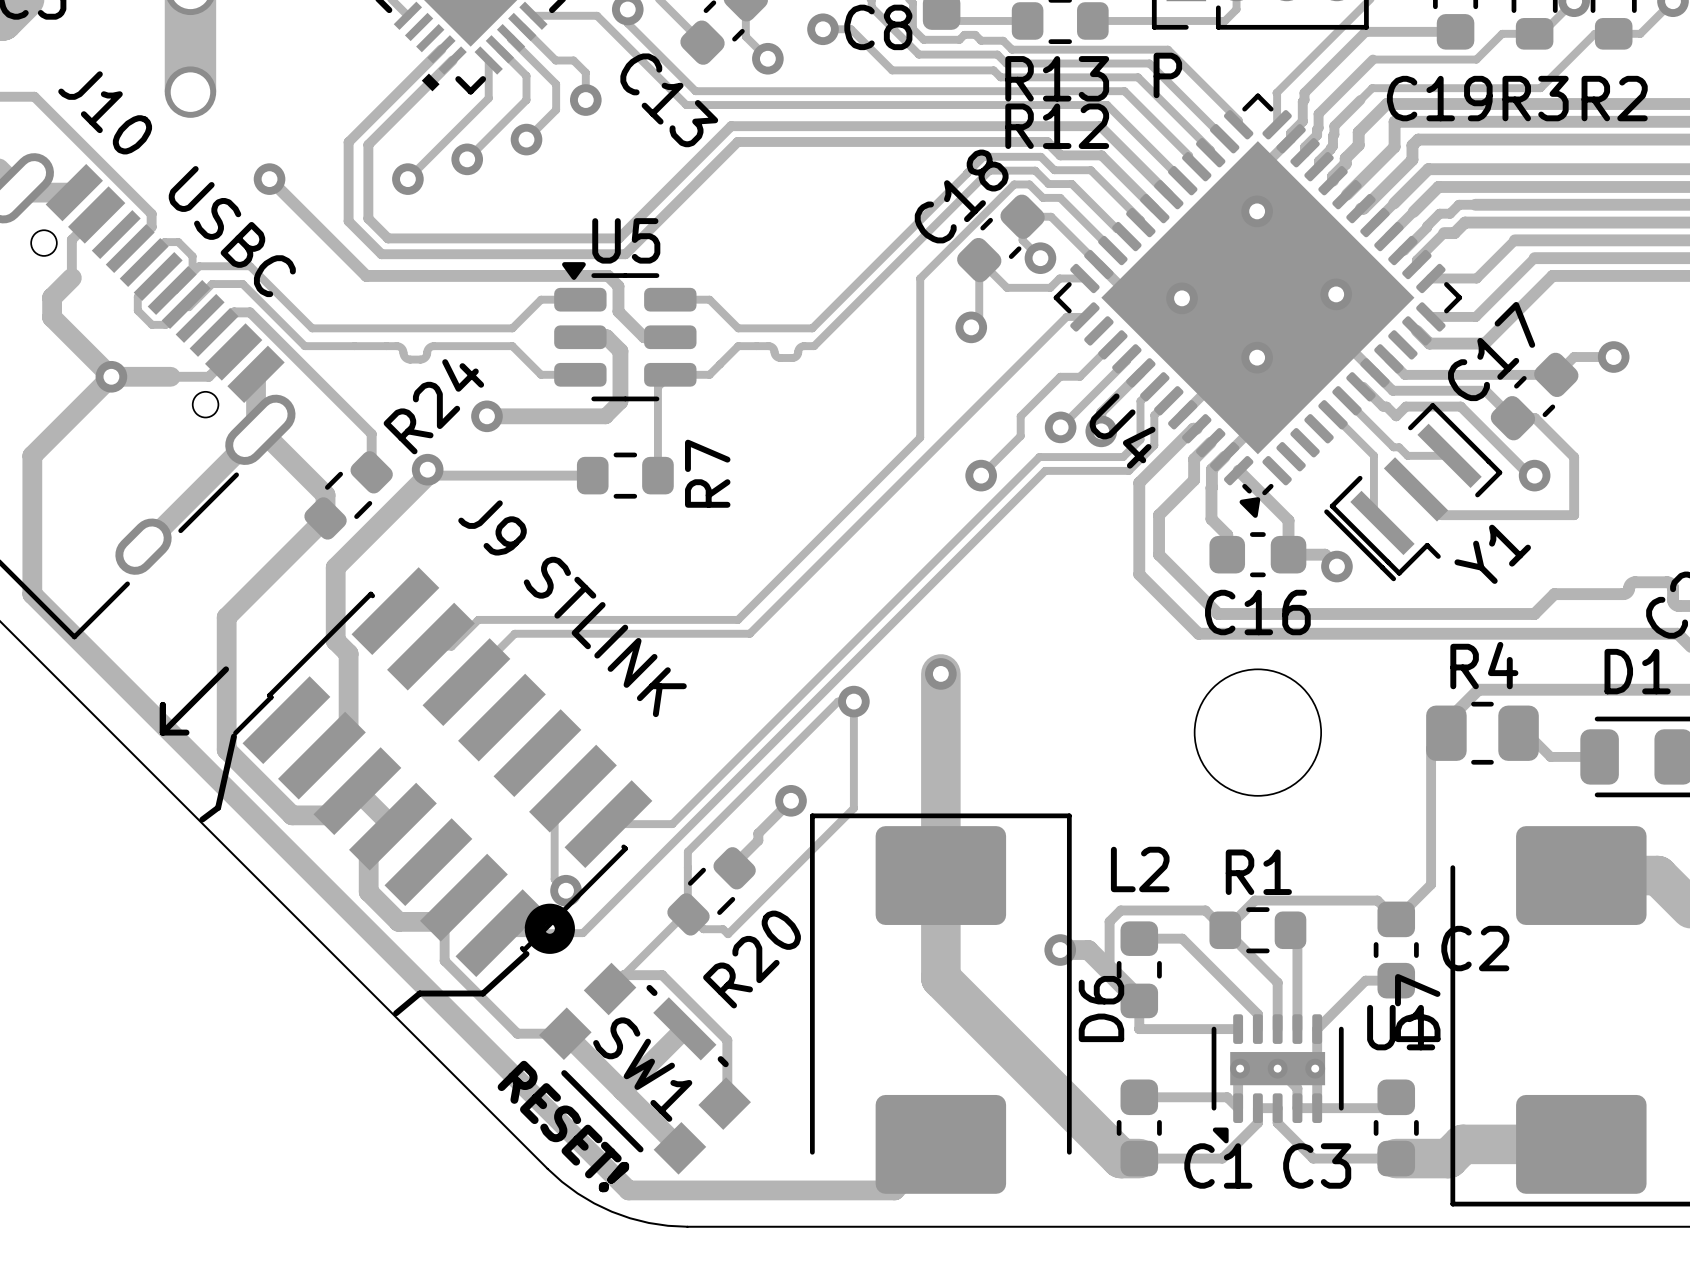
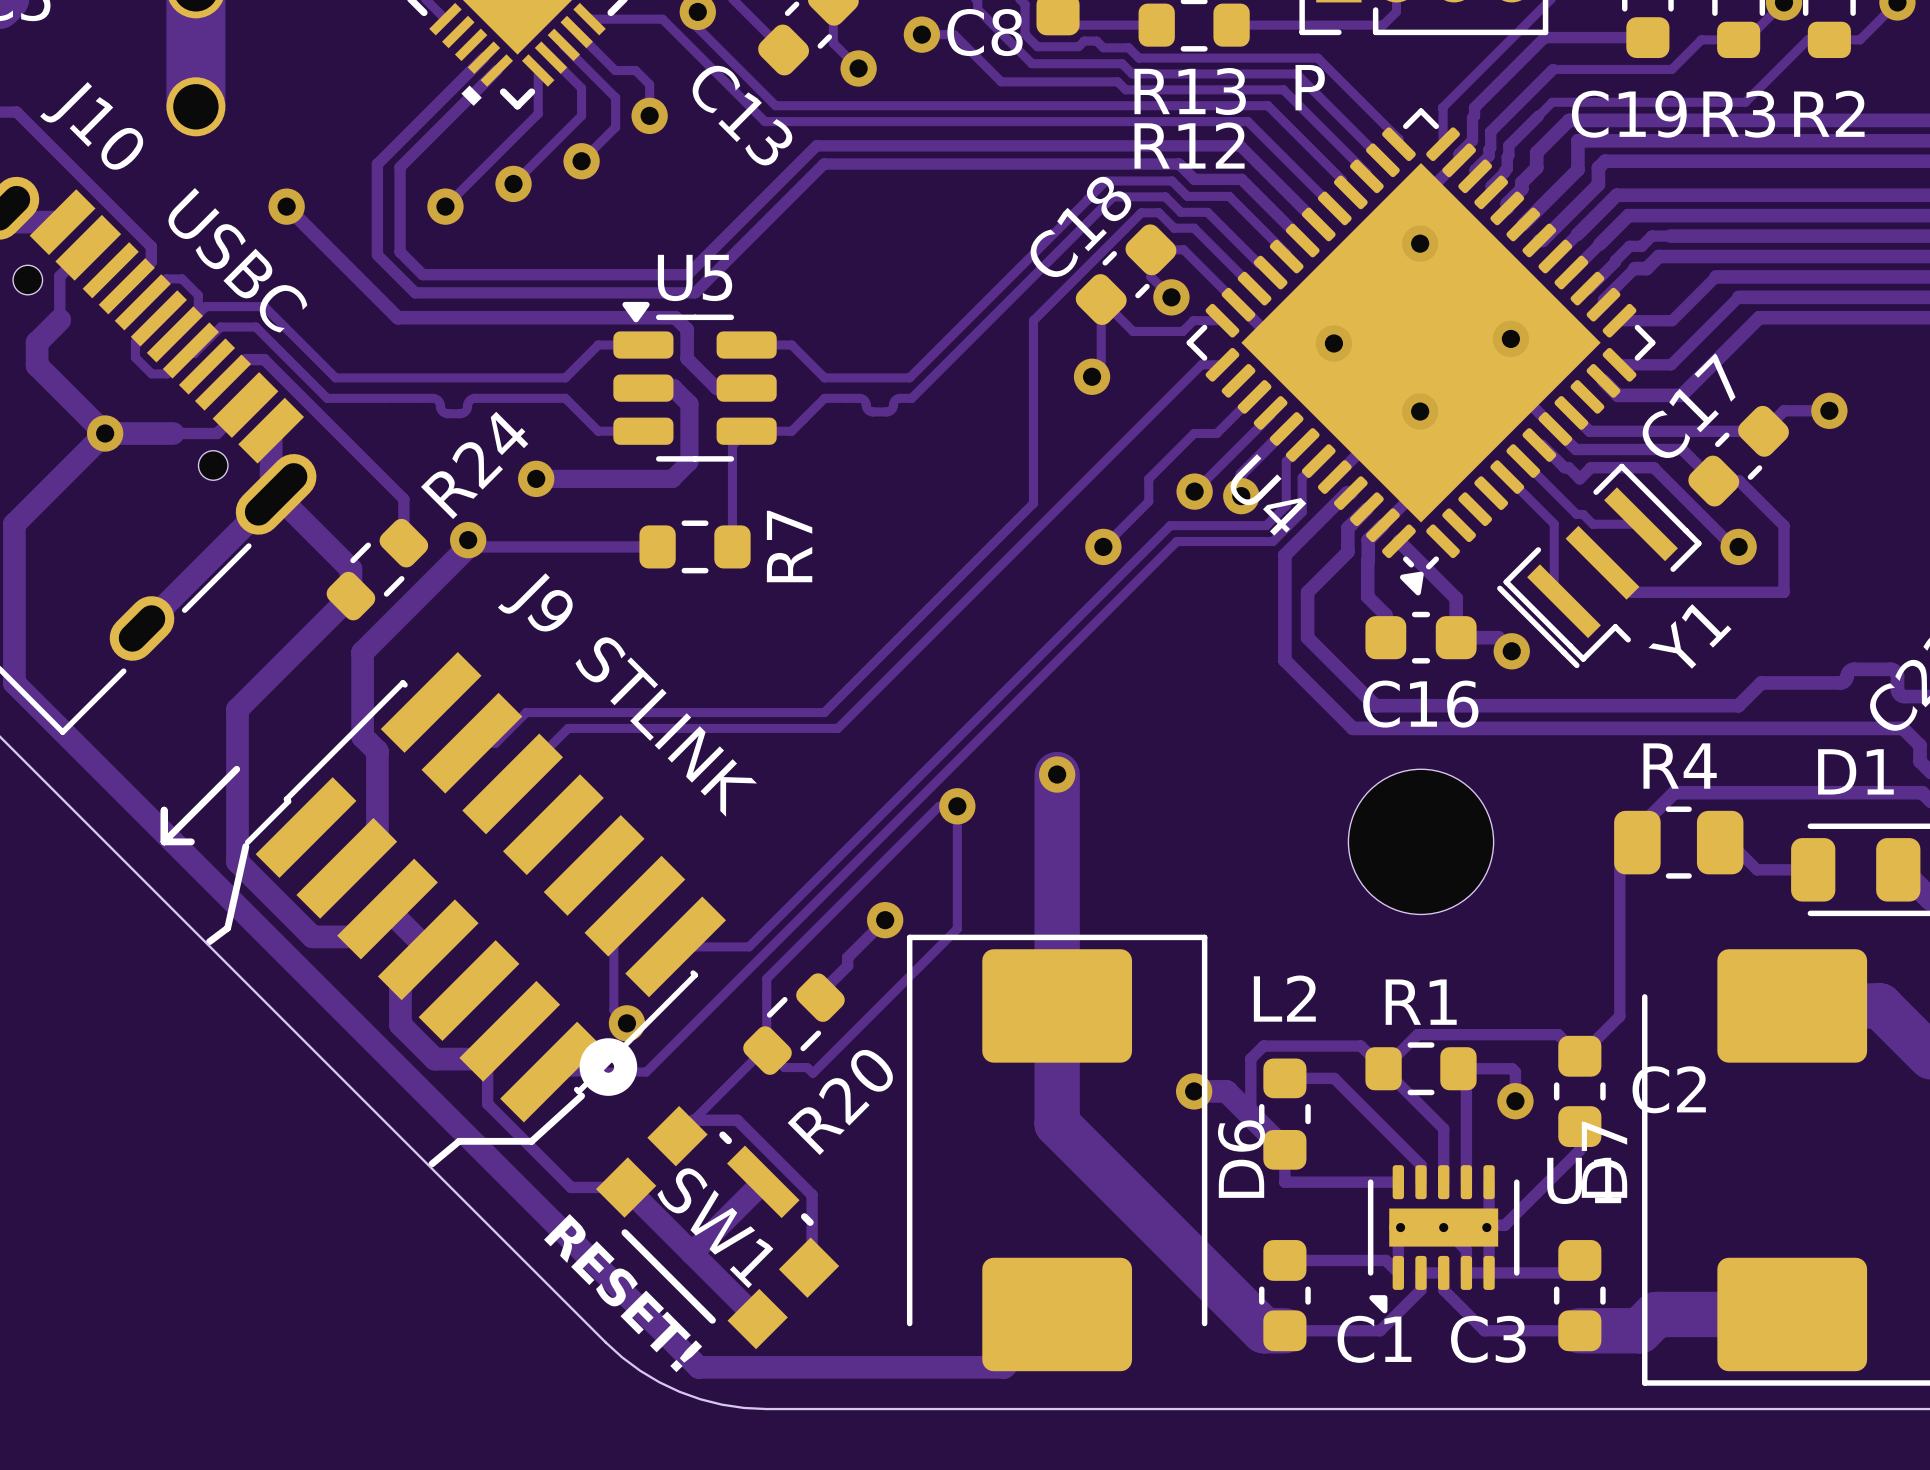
track: none -> (1458, 1068) (1511, 1068) (1515, 1072) (1515, 1101)
via: none -> (1515, 1101)
track: (1396, 980) (1365, 980) (1317, 1029) -> (1579, 1126) (1579, 1150) (1504, 1225) (1489, 1225) (1486, 1227)

